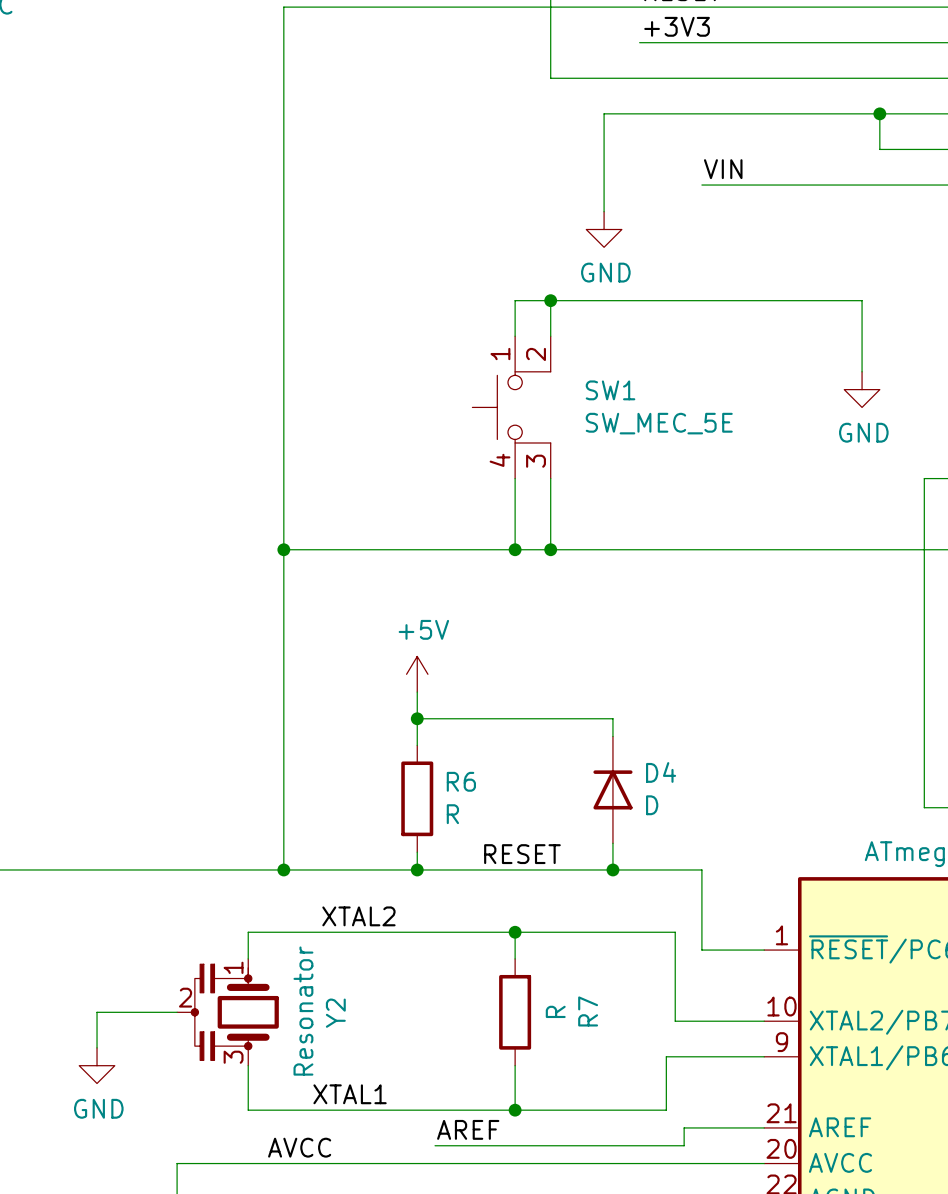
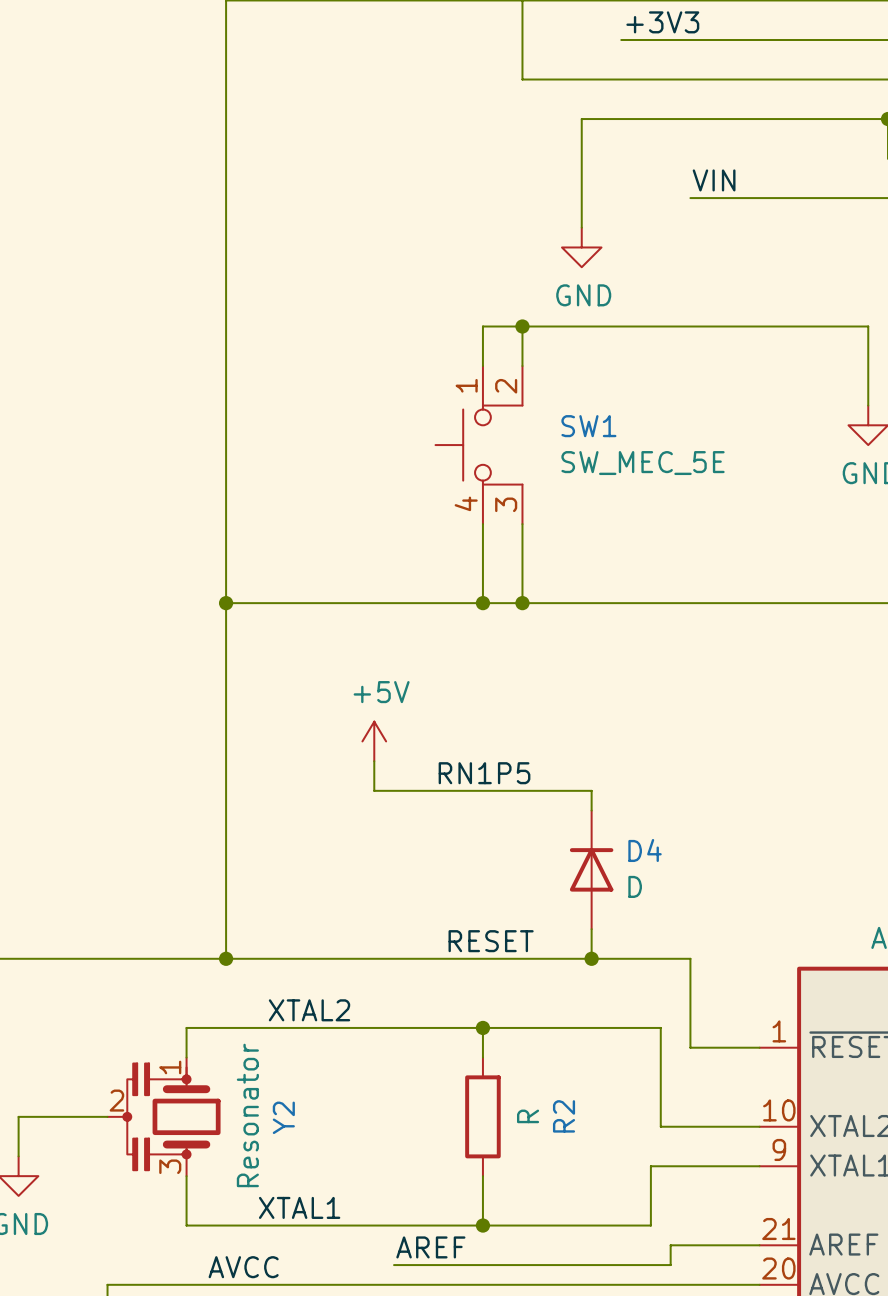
label: none -> RN1P5 (484, 773)
wire: (417, 718) (417, 745) -> none
junction: (417, 718) -> none
R6: R (417, 798) -> none
wire: (417, 852) (417, 869) -> none
junction: (417, 869) -> none
R7 name: R7 (588, 1011) -> R2 (564, 1116)

